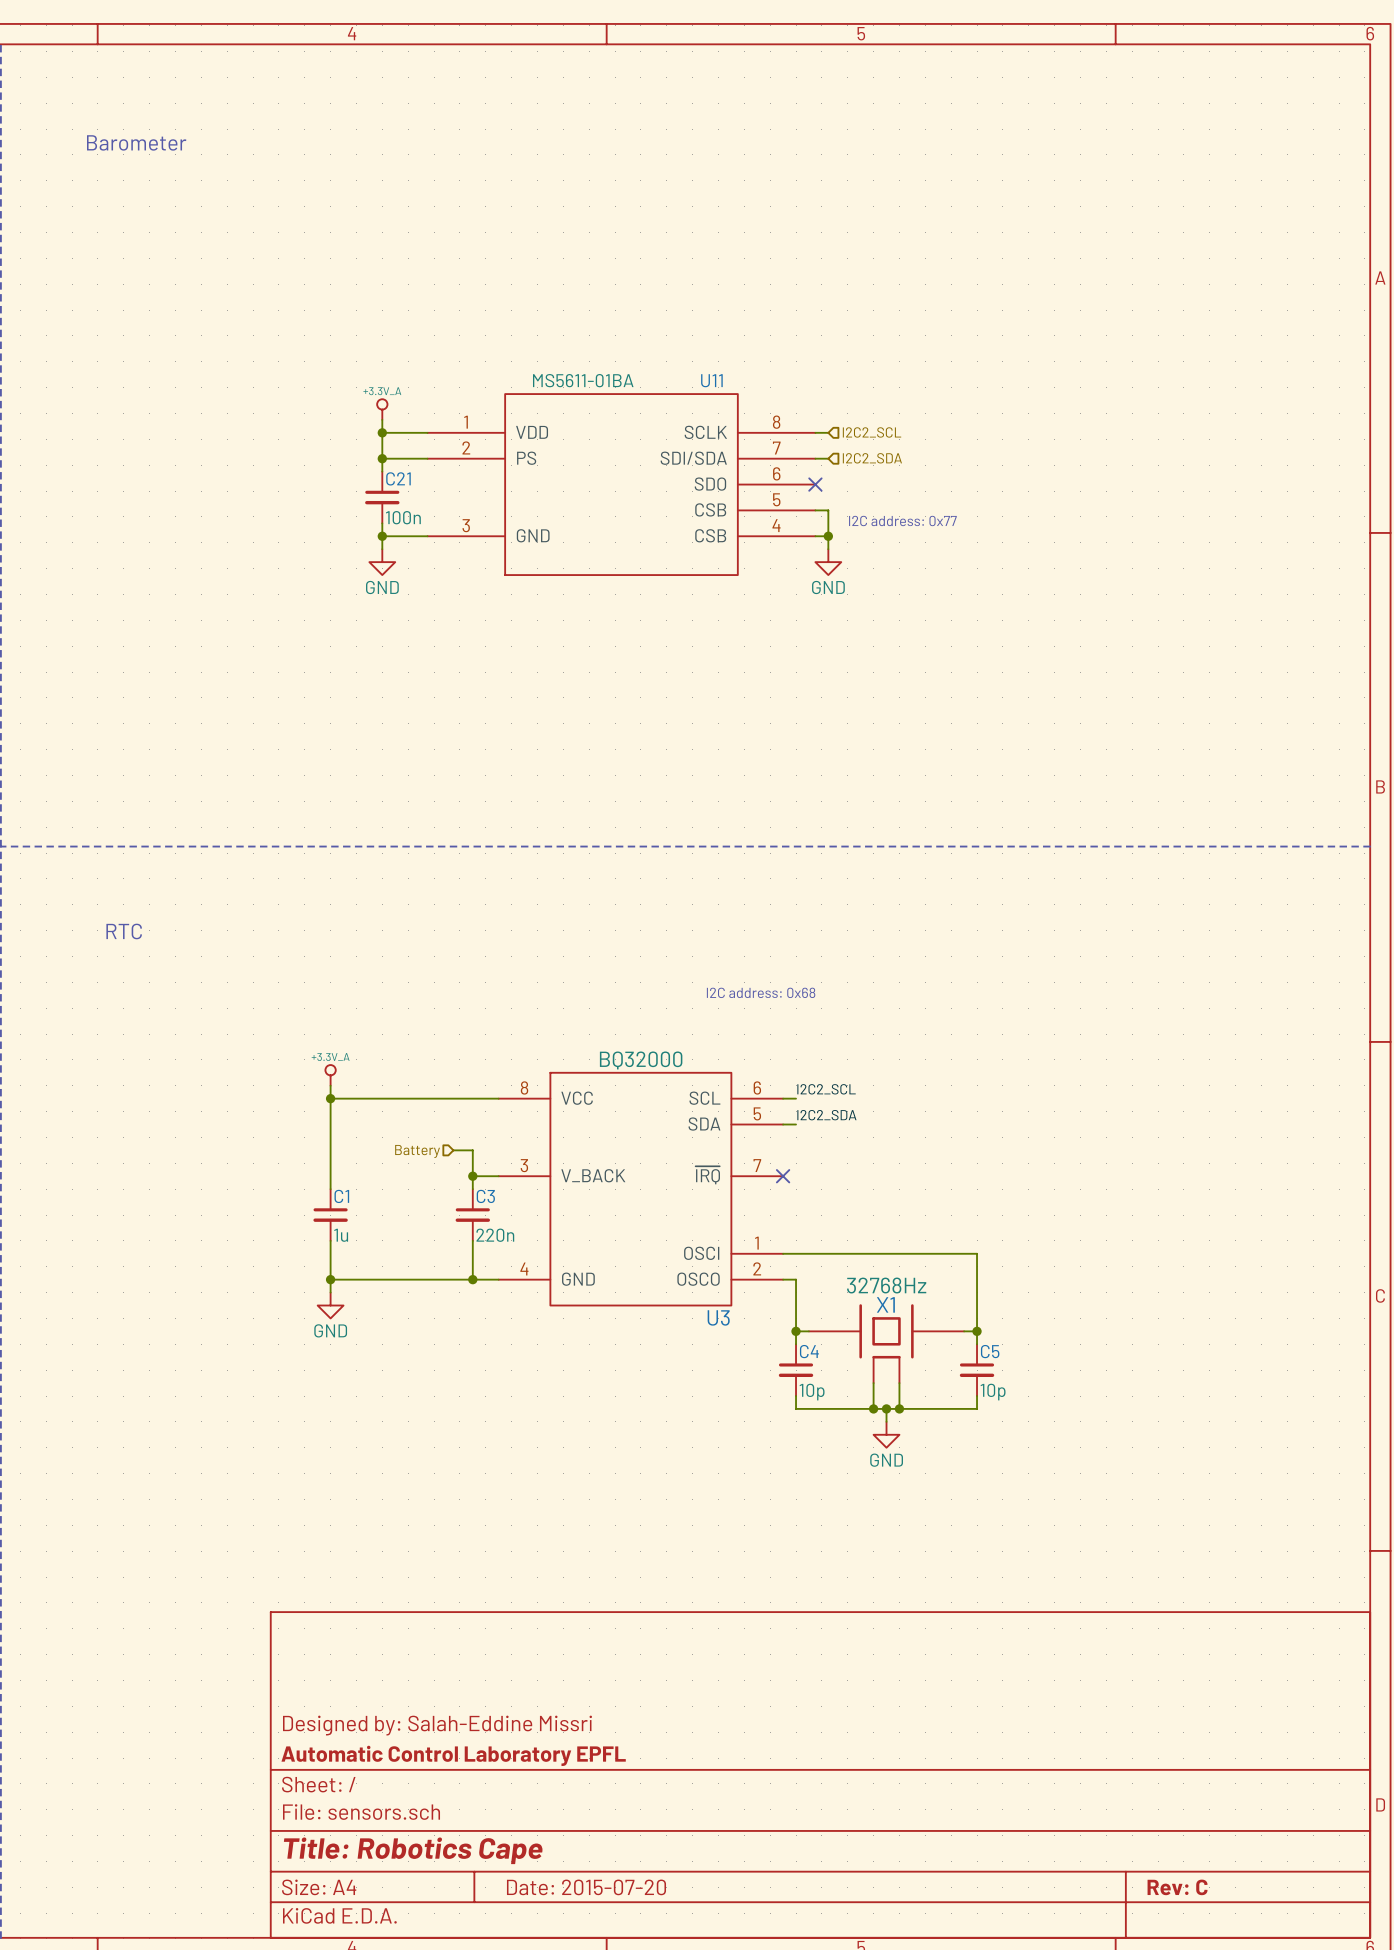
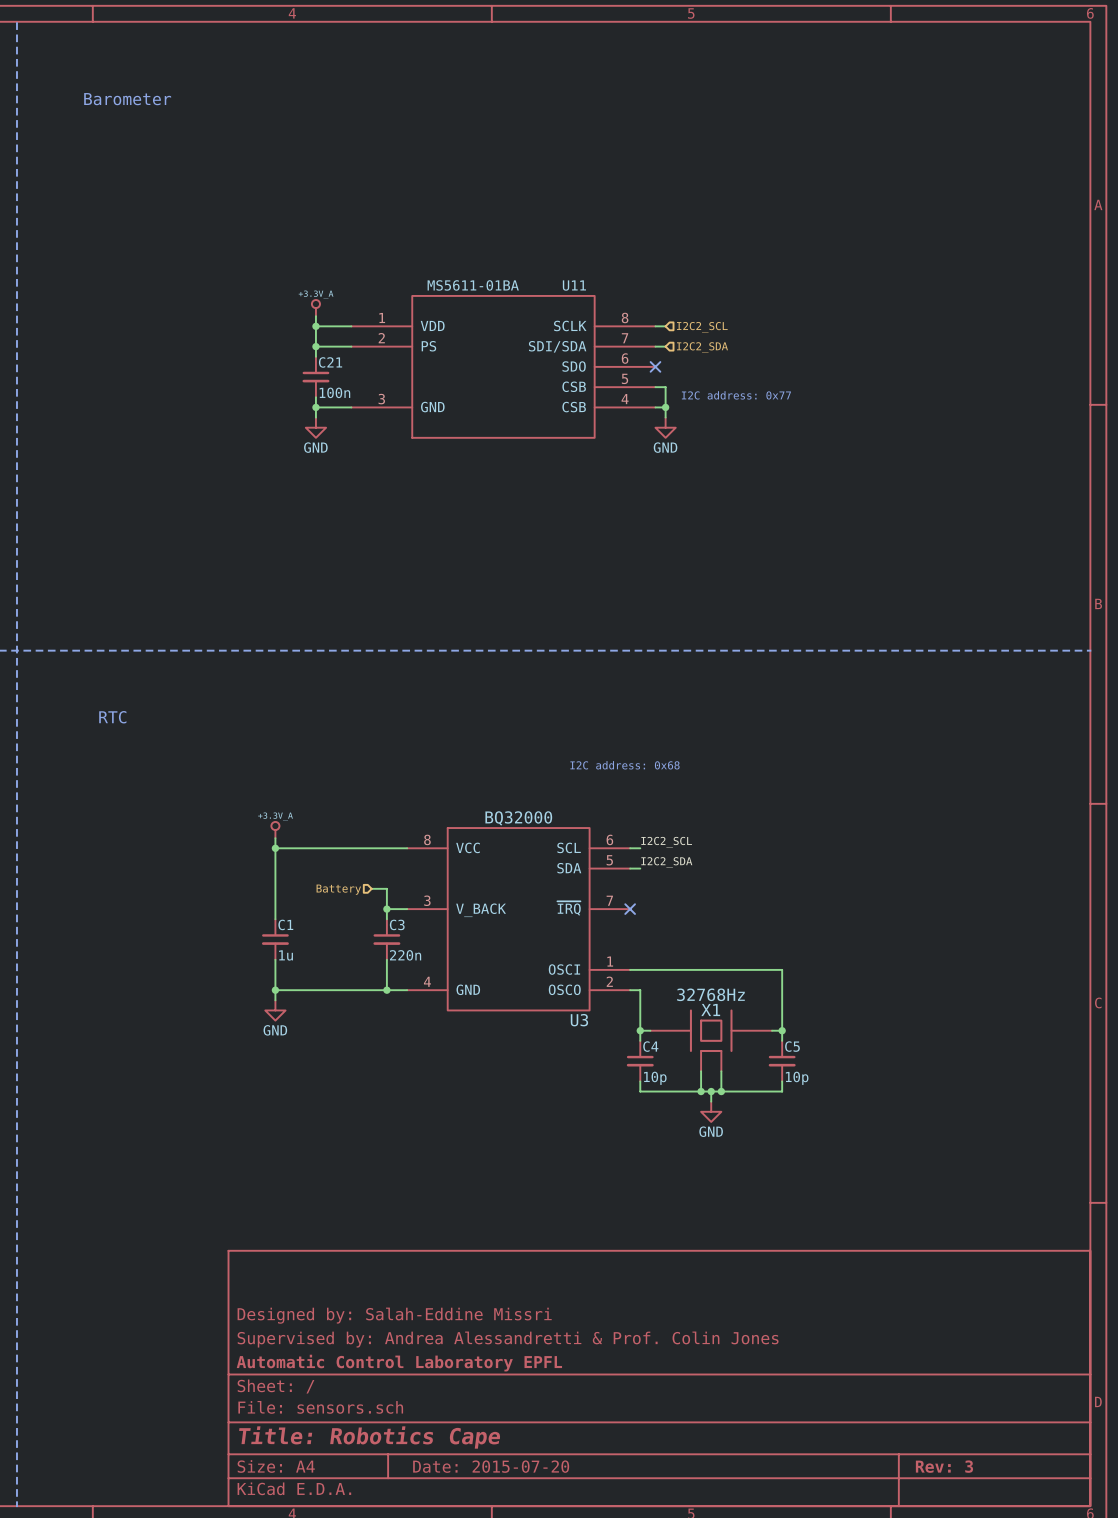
title block: none -> Designed by: Salah-Eddine Missri (394, 1315)
title block: Designed by: Salah-Eddine Missri (437, 1725) -> Supervised by: Andrea Alessandretti & Prof. Colin Jones (508, 1339)
title block: Rev: C (1177, 1887) -> Rev: 3 (944, 1466)

